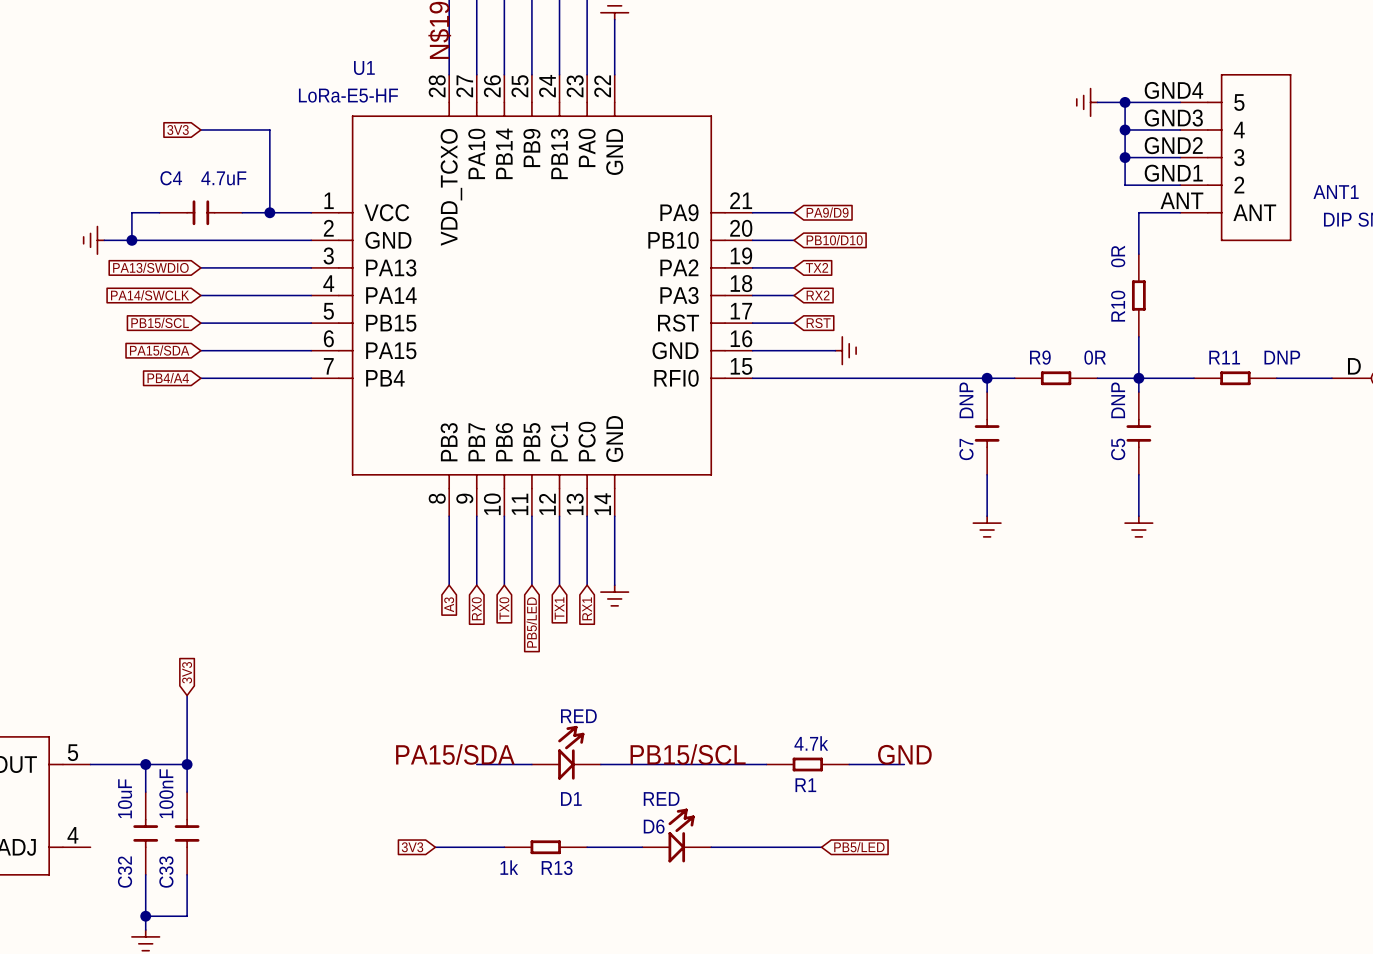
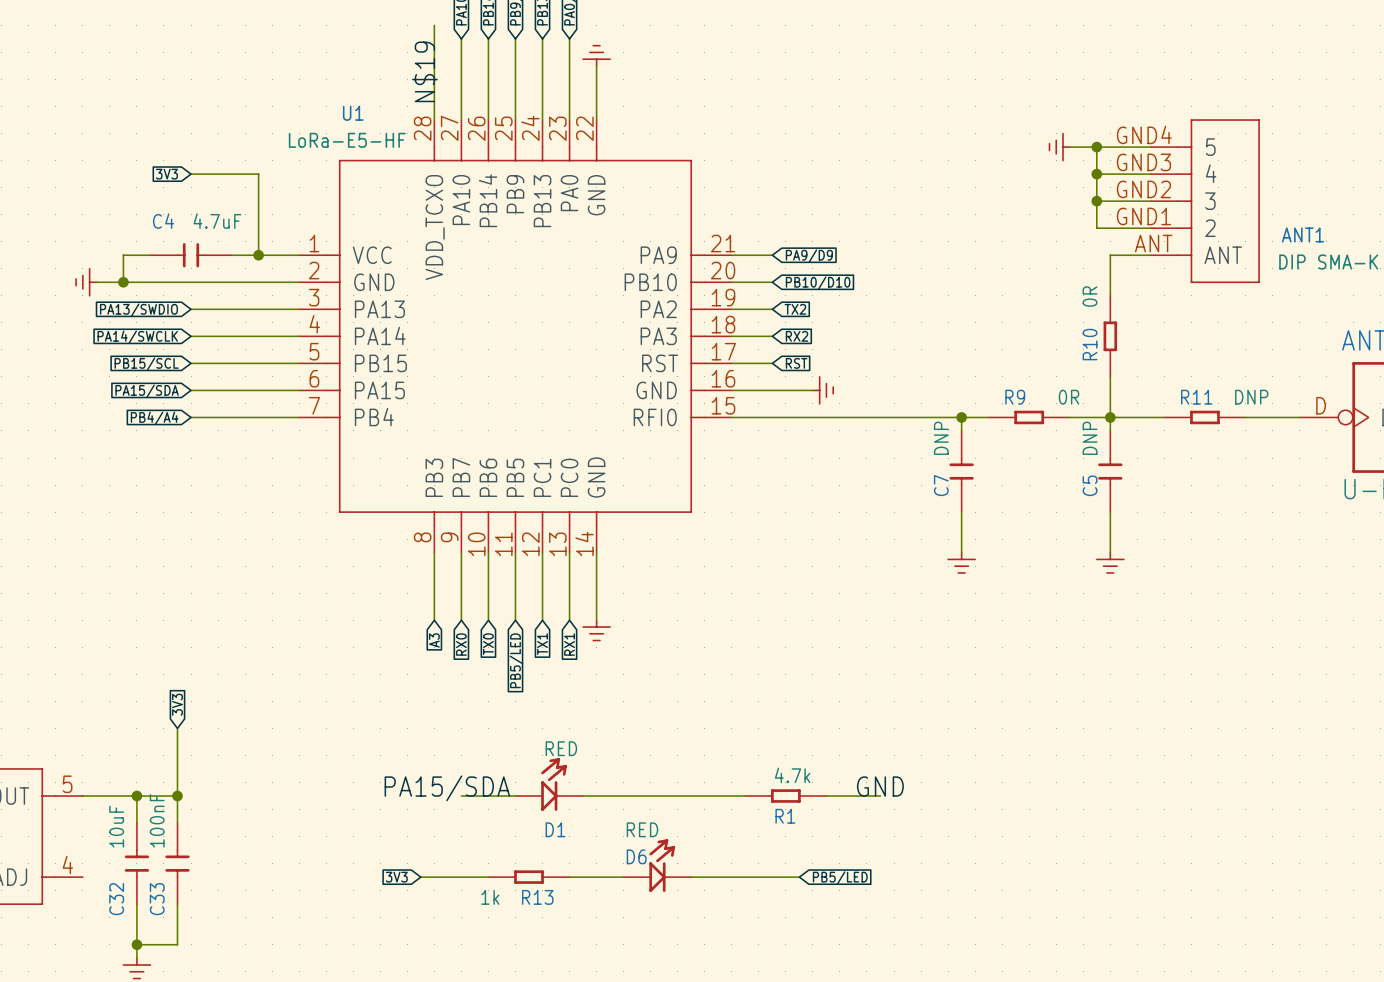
label: PB15/SCL (688, 754) -> none

